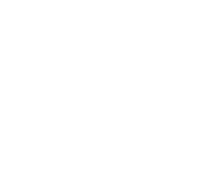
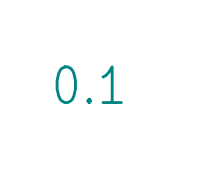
text: none -> 0.1 (89, 84)

